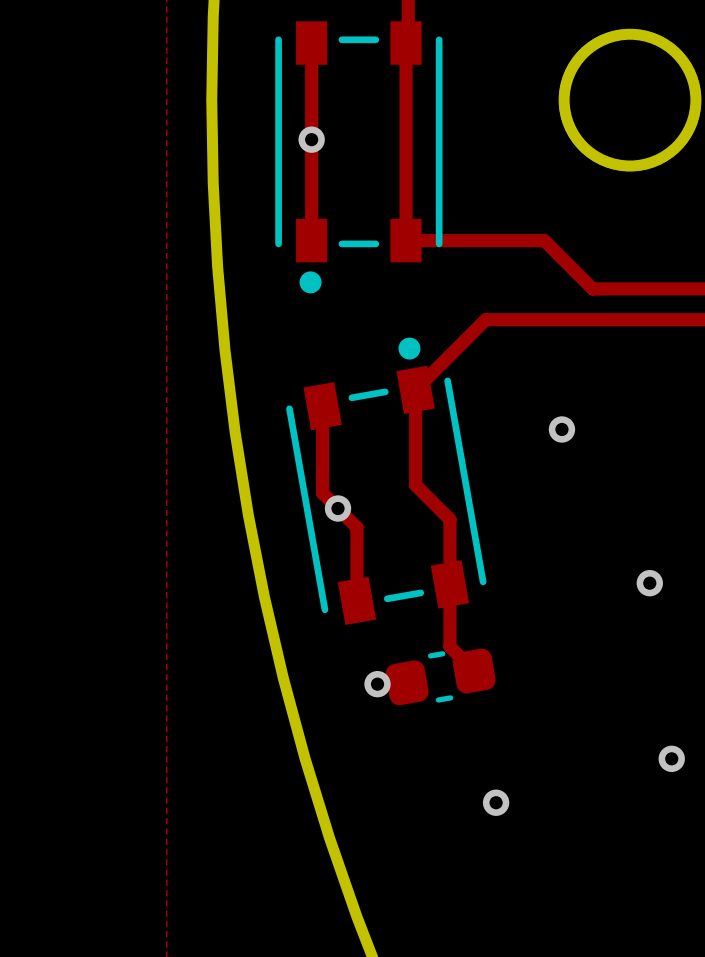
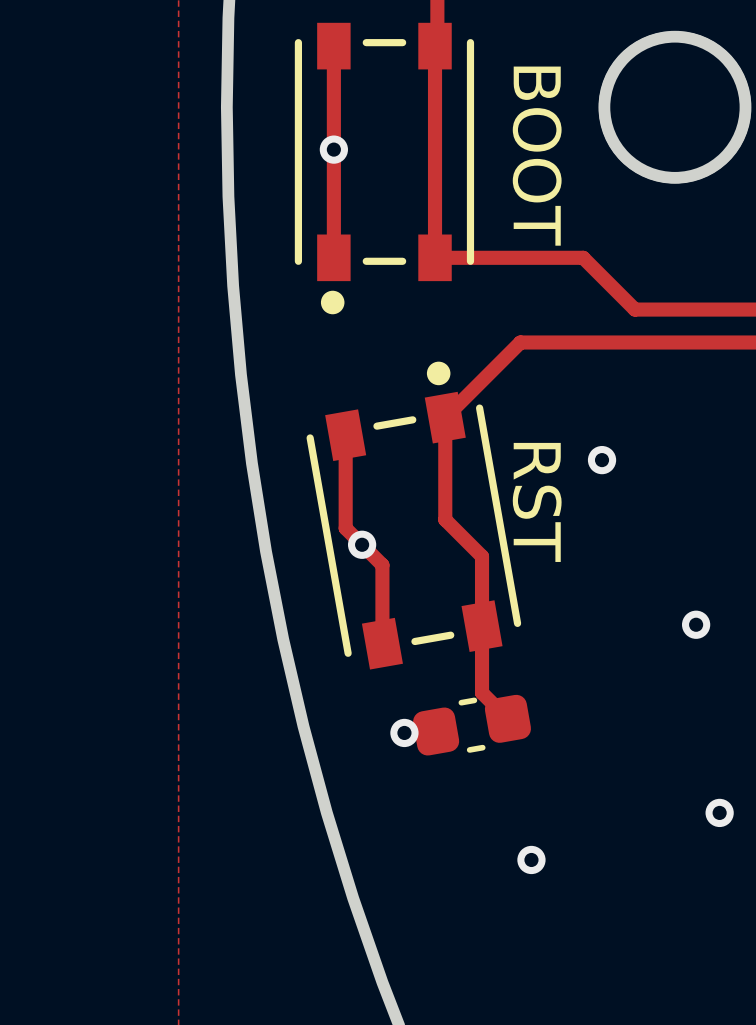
text: none -> BOOT (537, 156)
text: none -> RST (537, 502)

